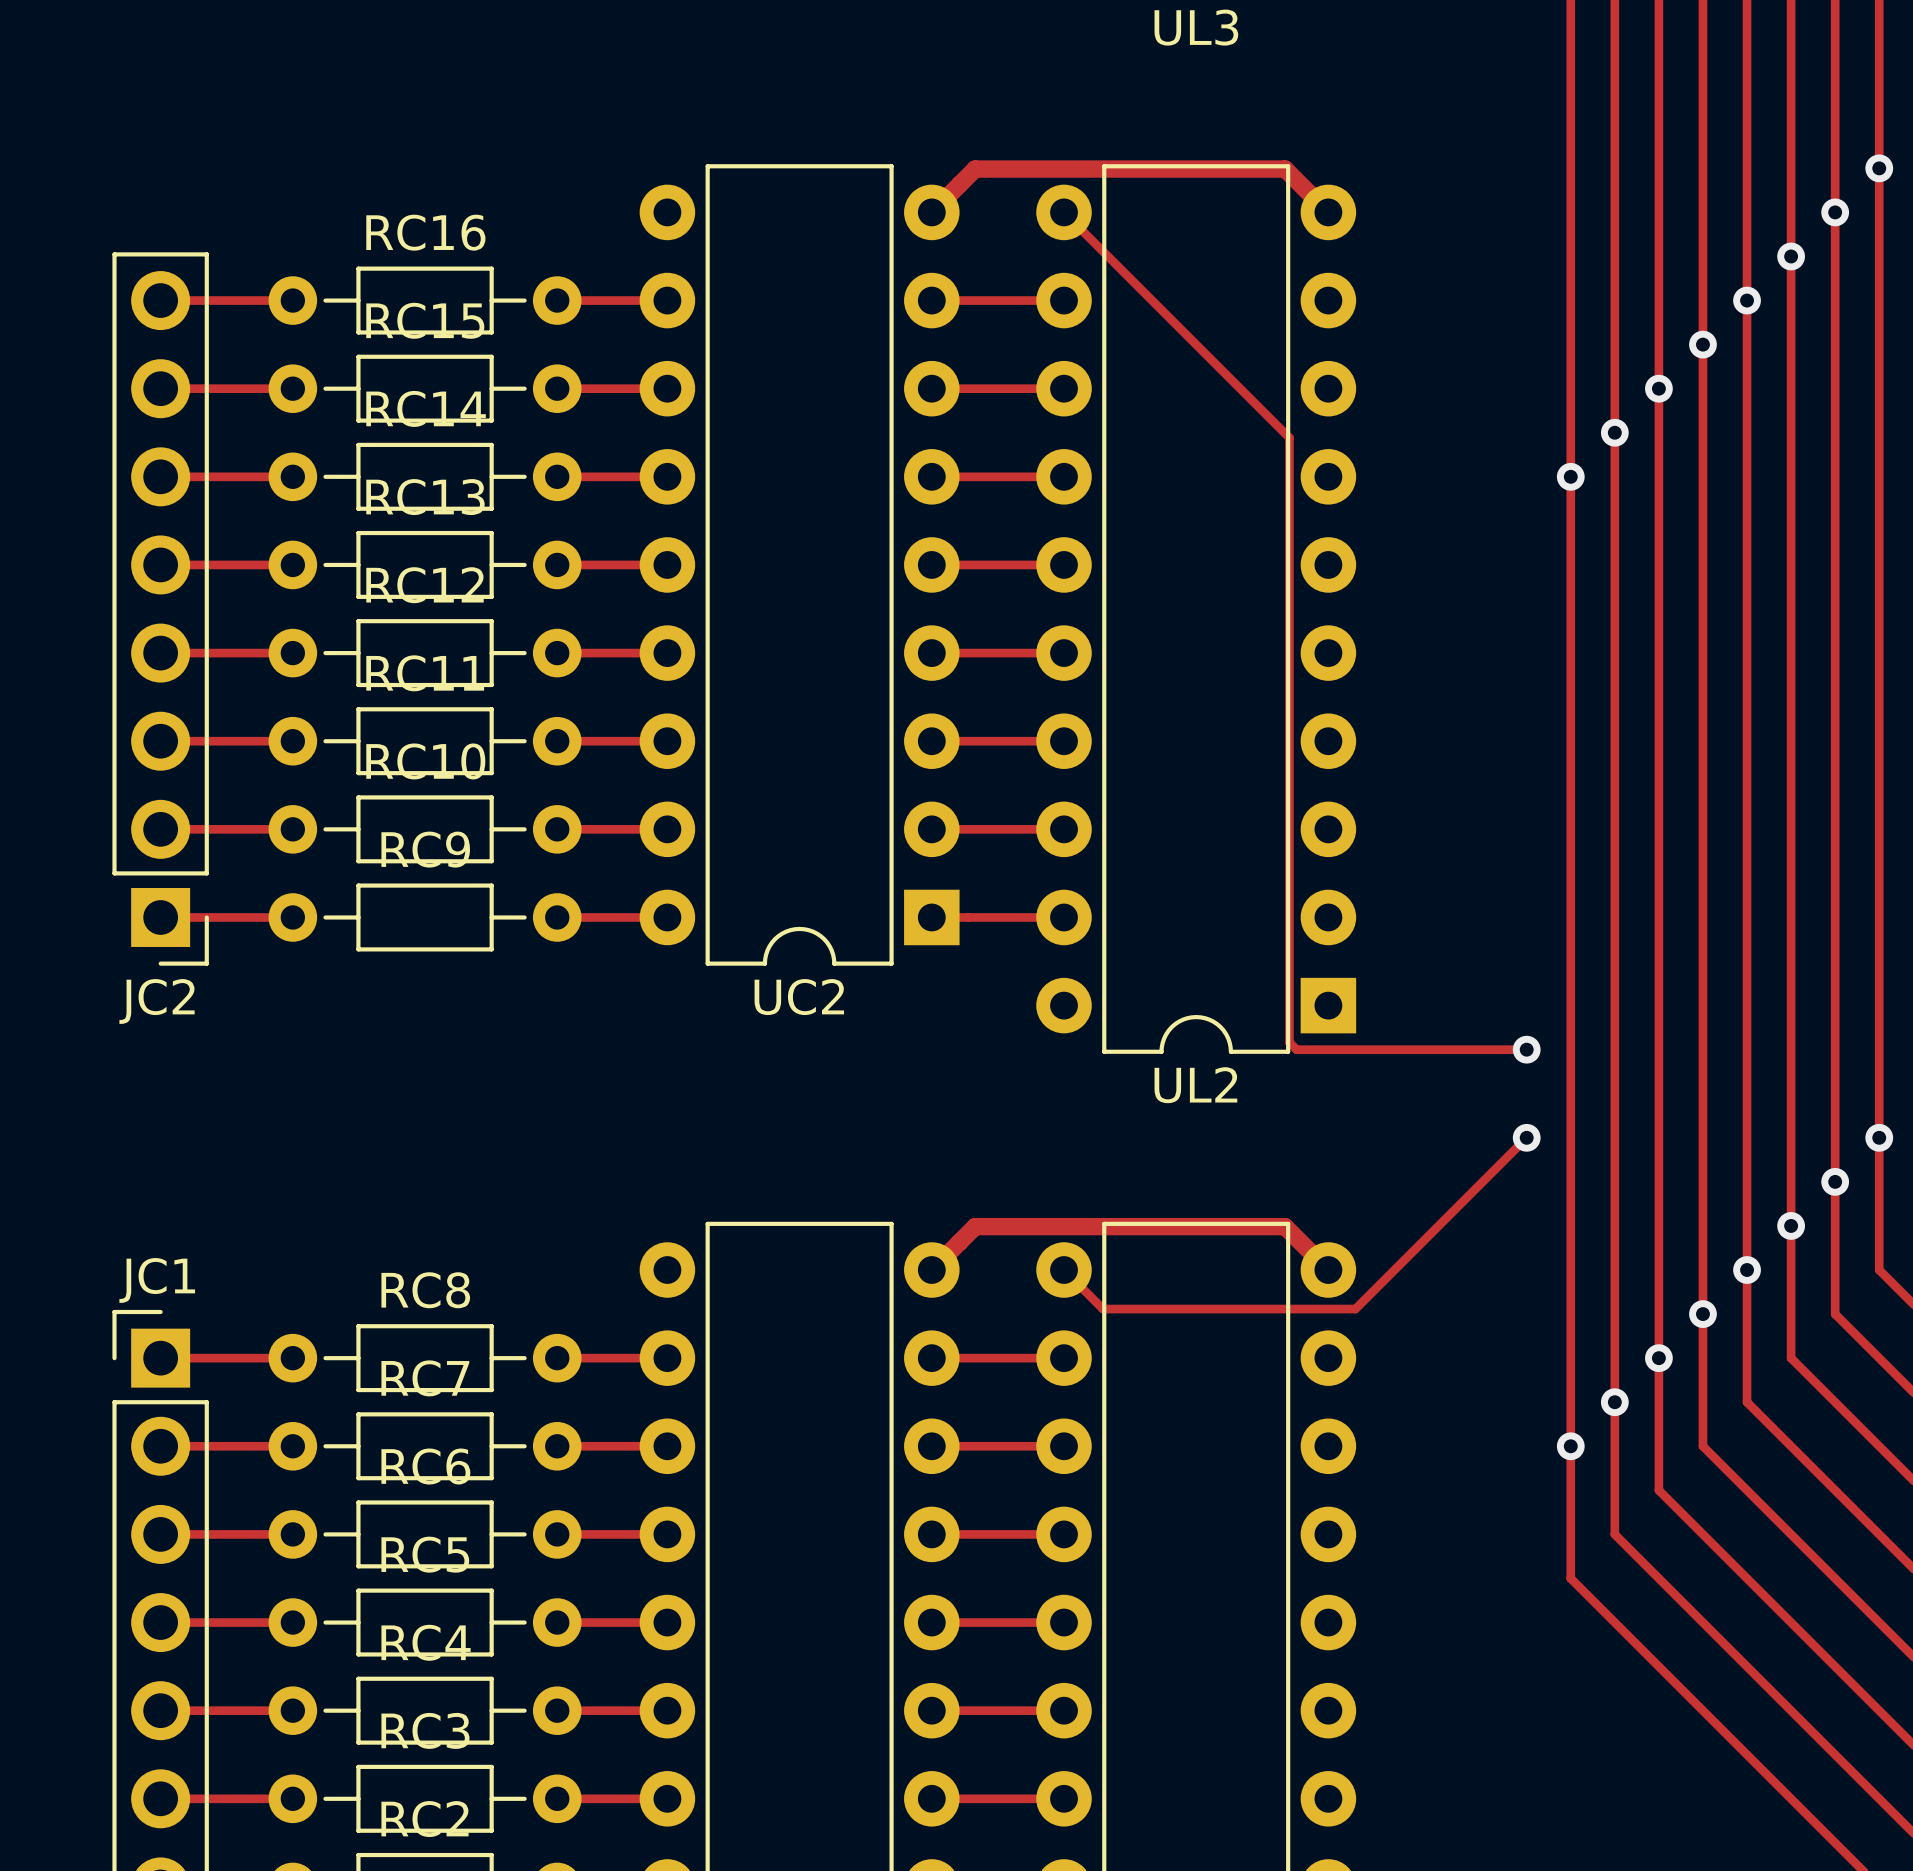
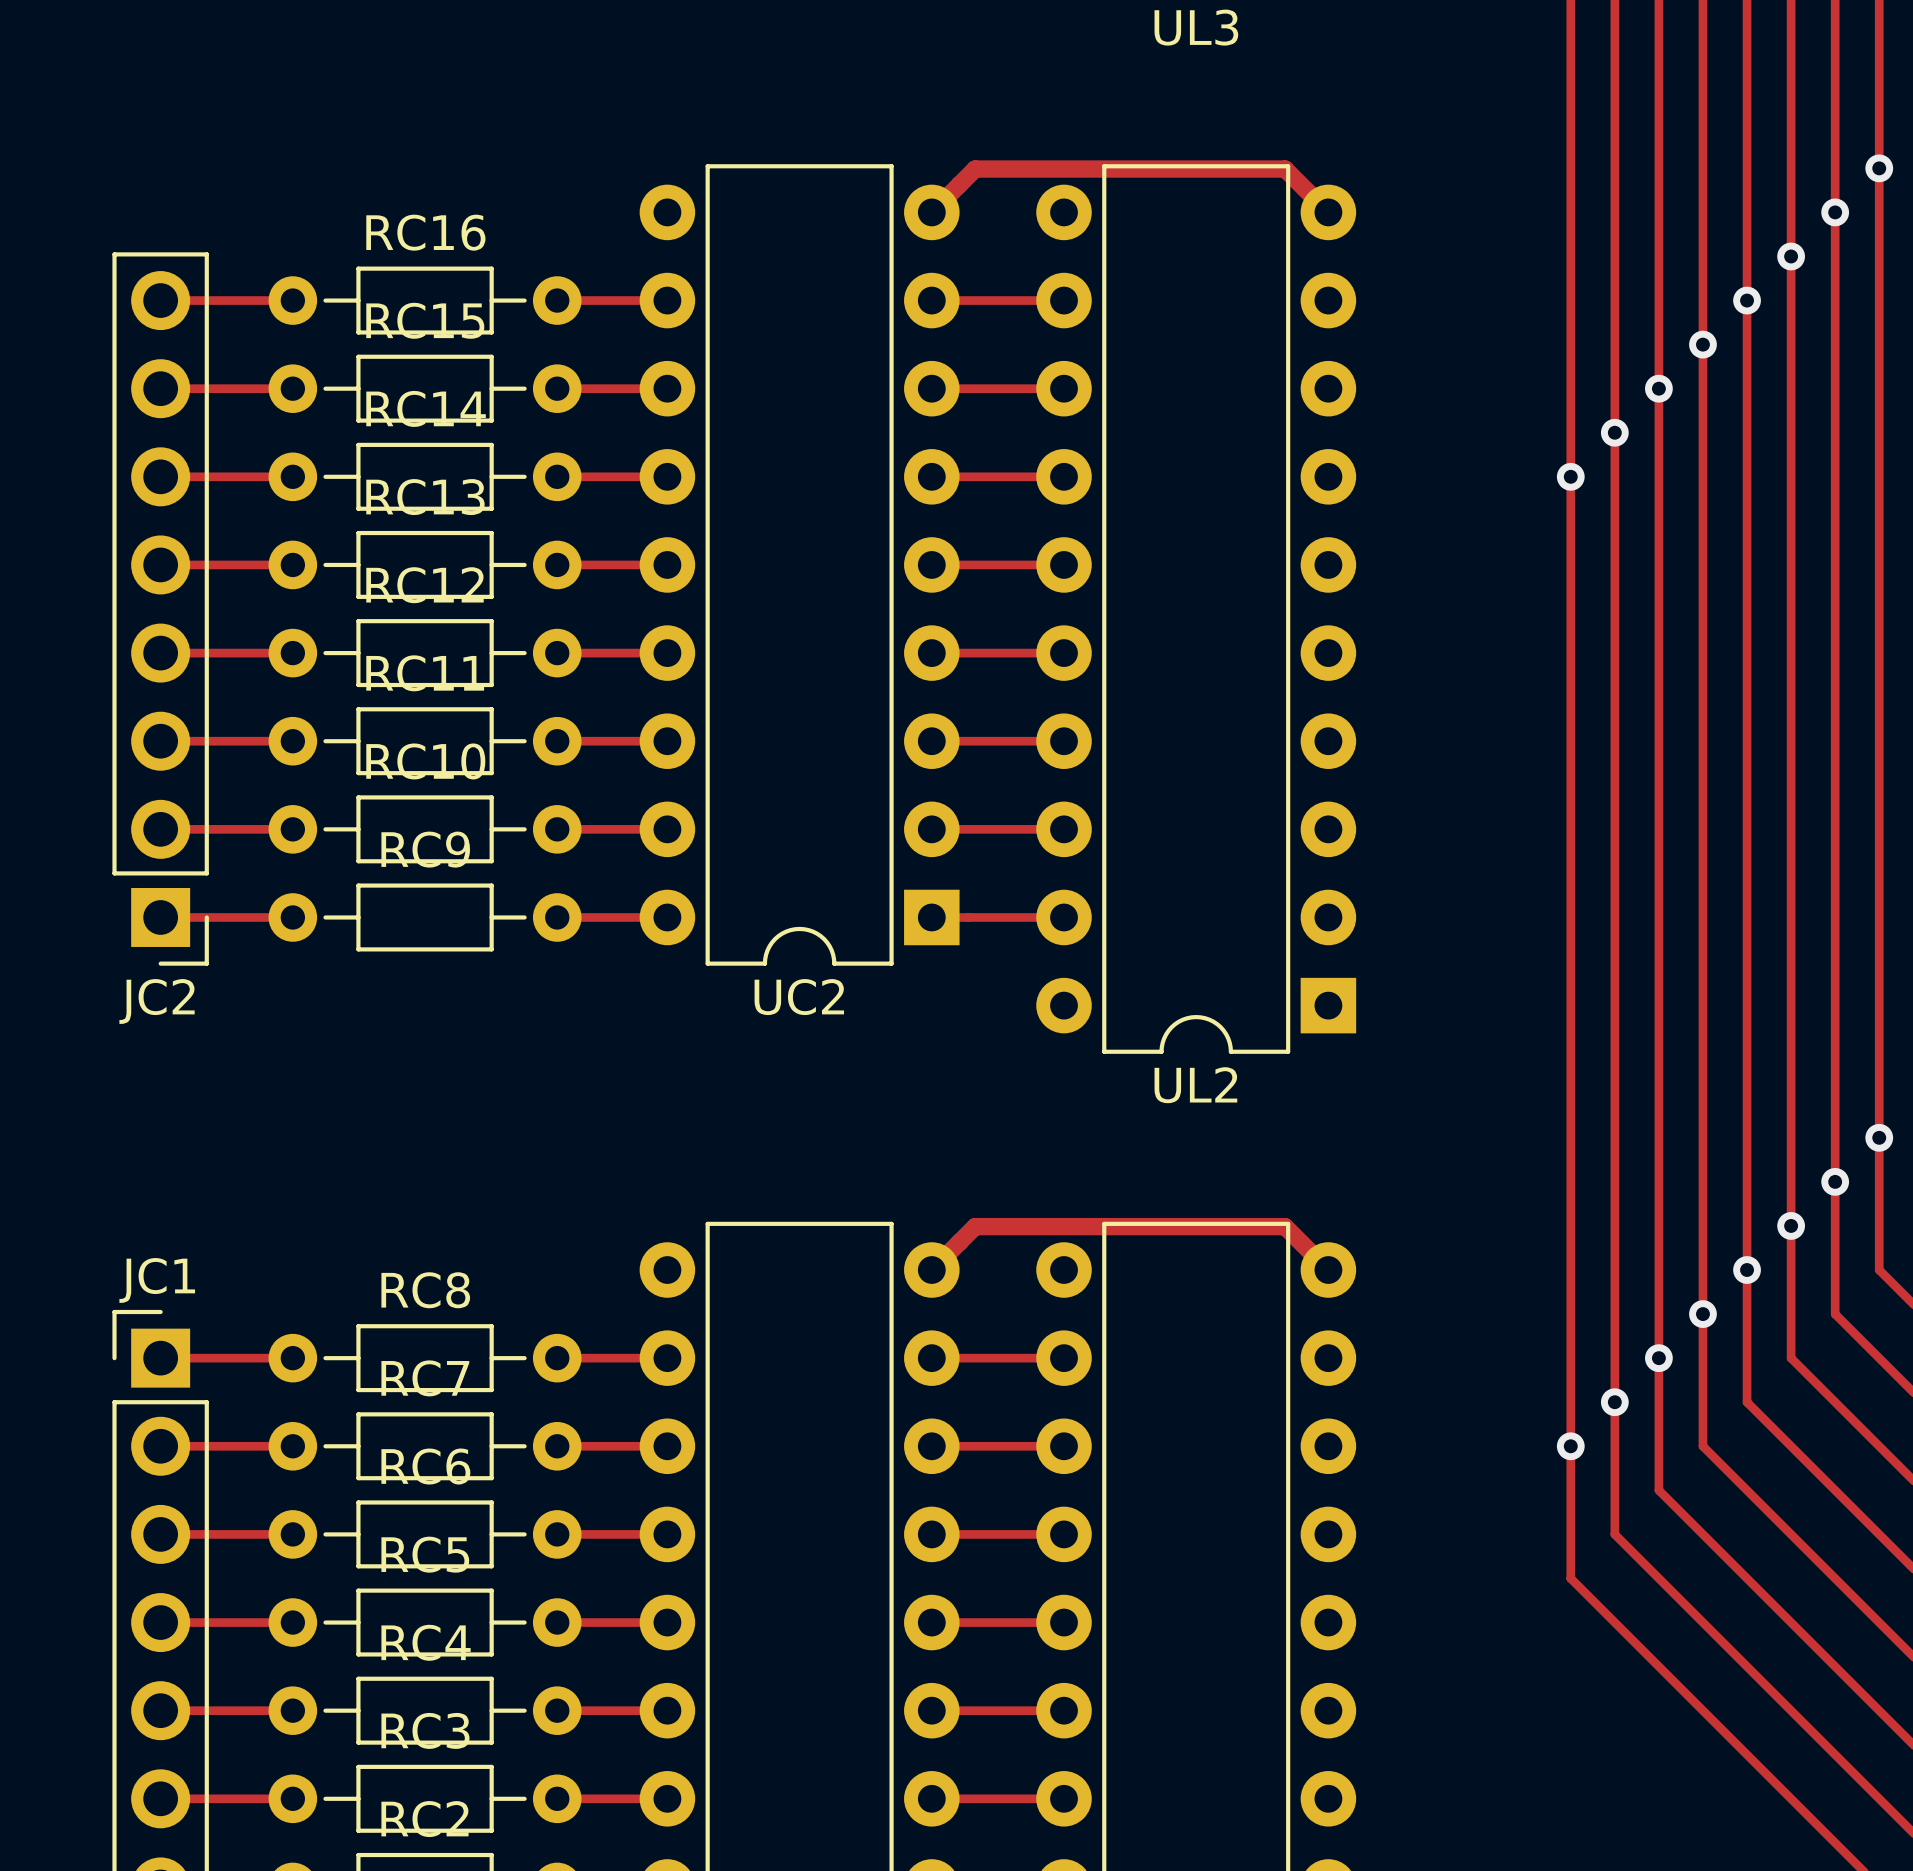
track: (1064, 212) (1289, 437) (1289, 1042) (1296, 1049) (1526, 1049) -> none
via: (1526, 1049) -> none
track: (1526, 1137) (1355, 1309) (1103, 1309) (1064, 1270) -> none
via: (1526, 1137) -> none

